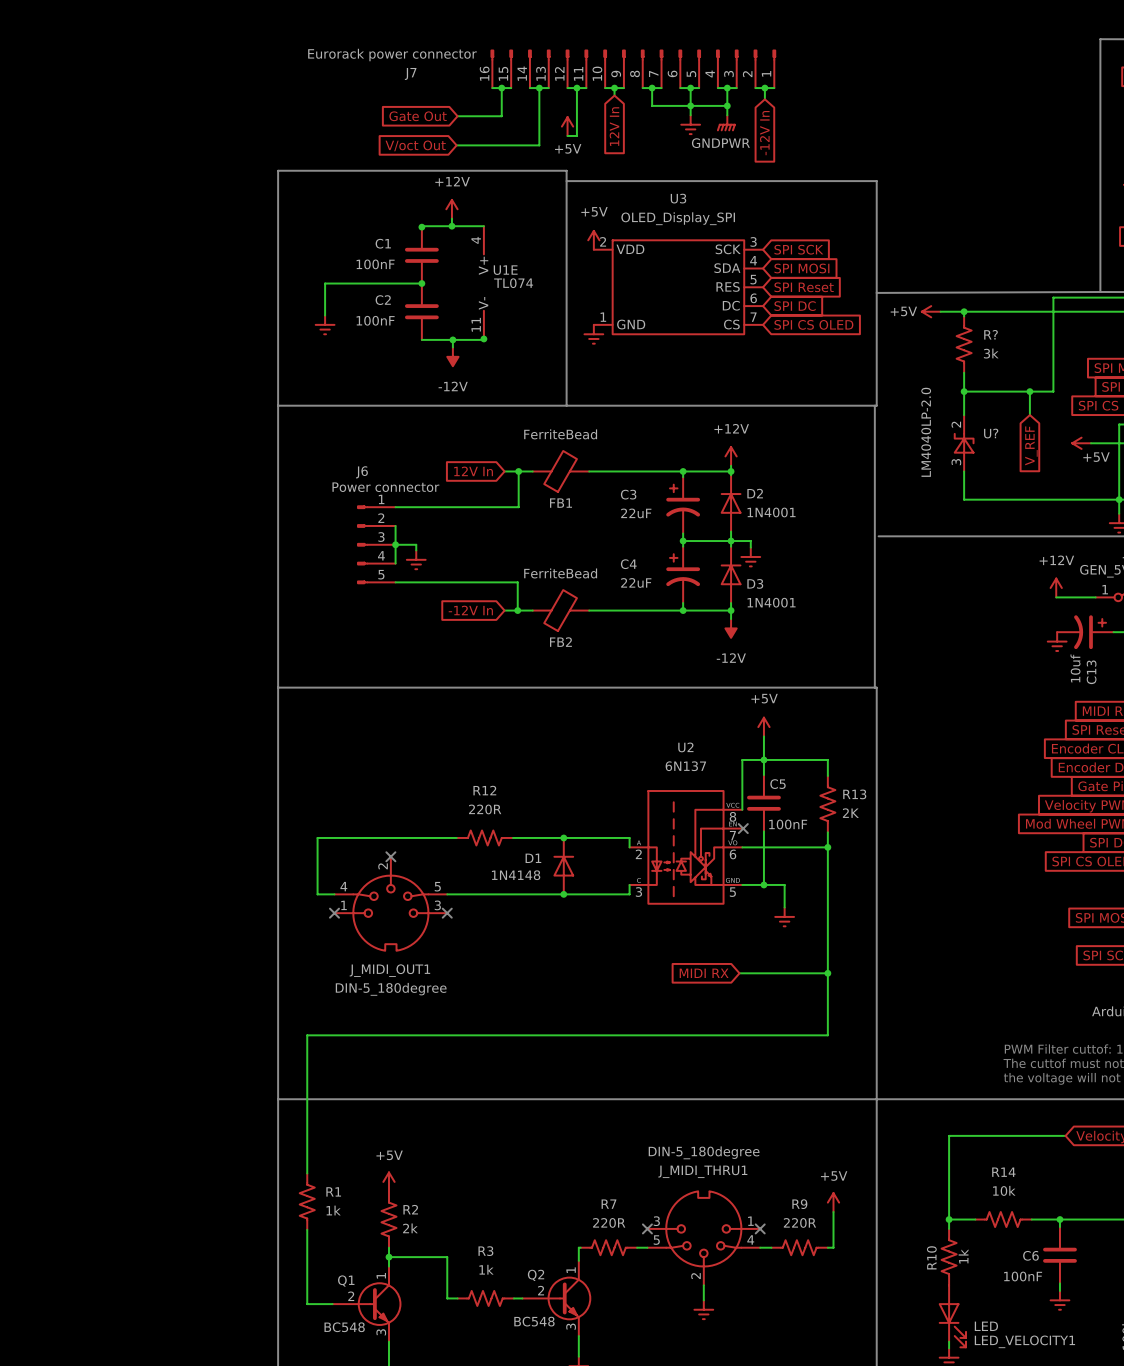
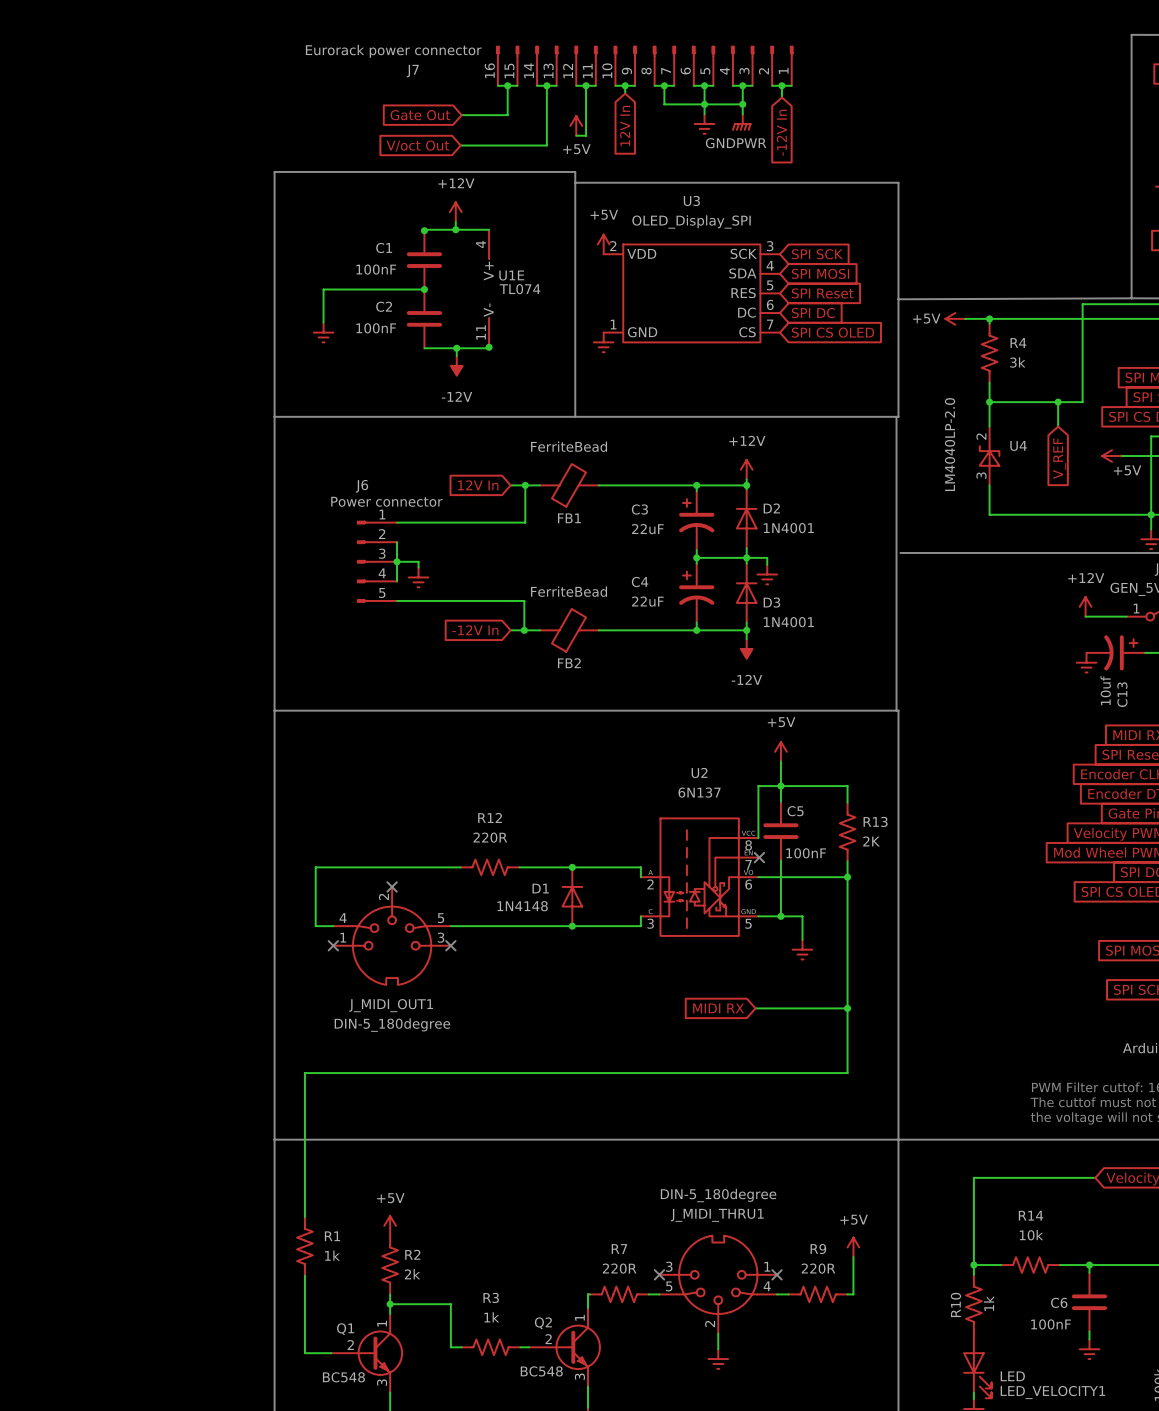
R? name: R? (991, 334) -> R4 (1018, 343)
U? name: U? (991, 433) -> U4 (1018, 445)

